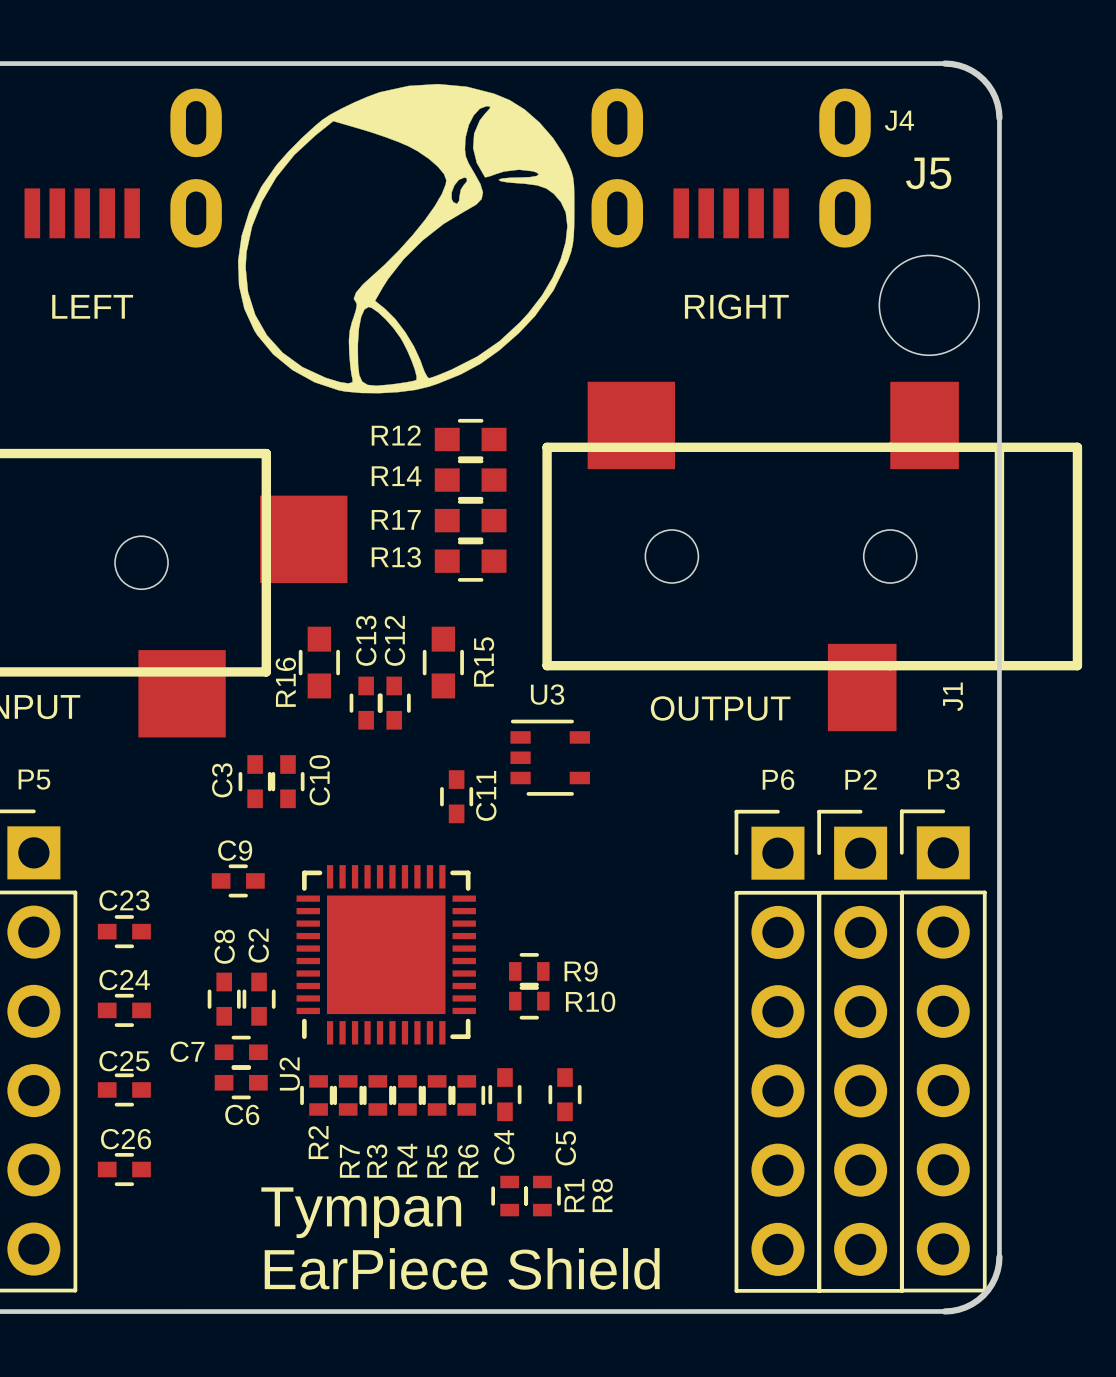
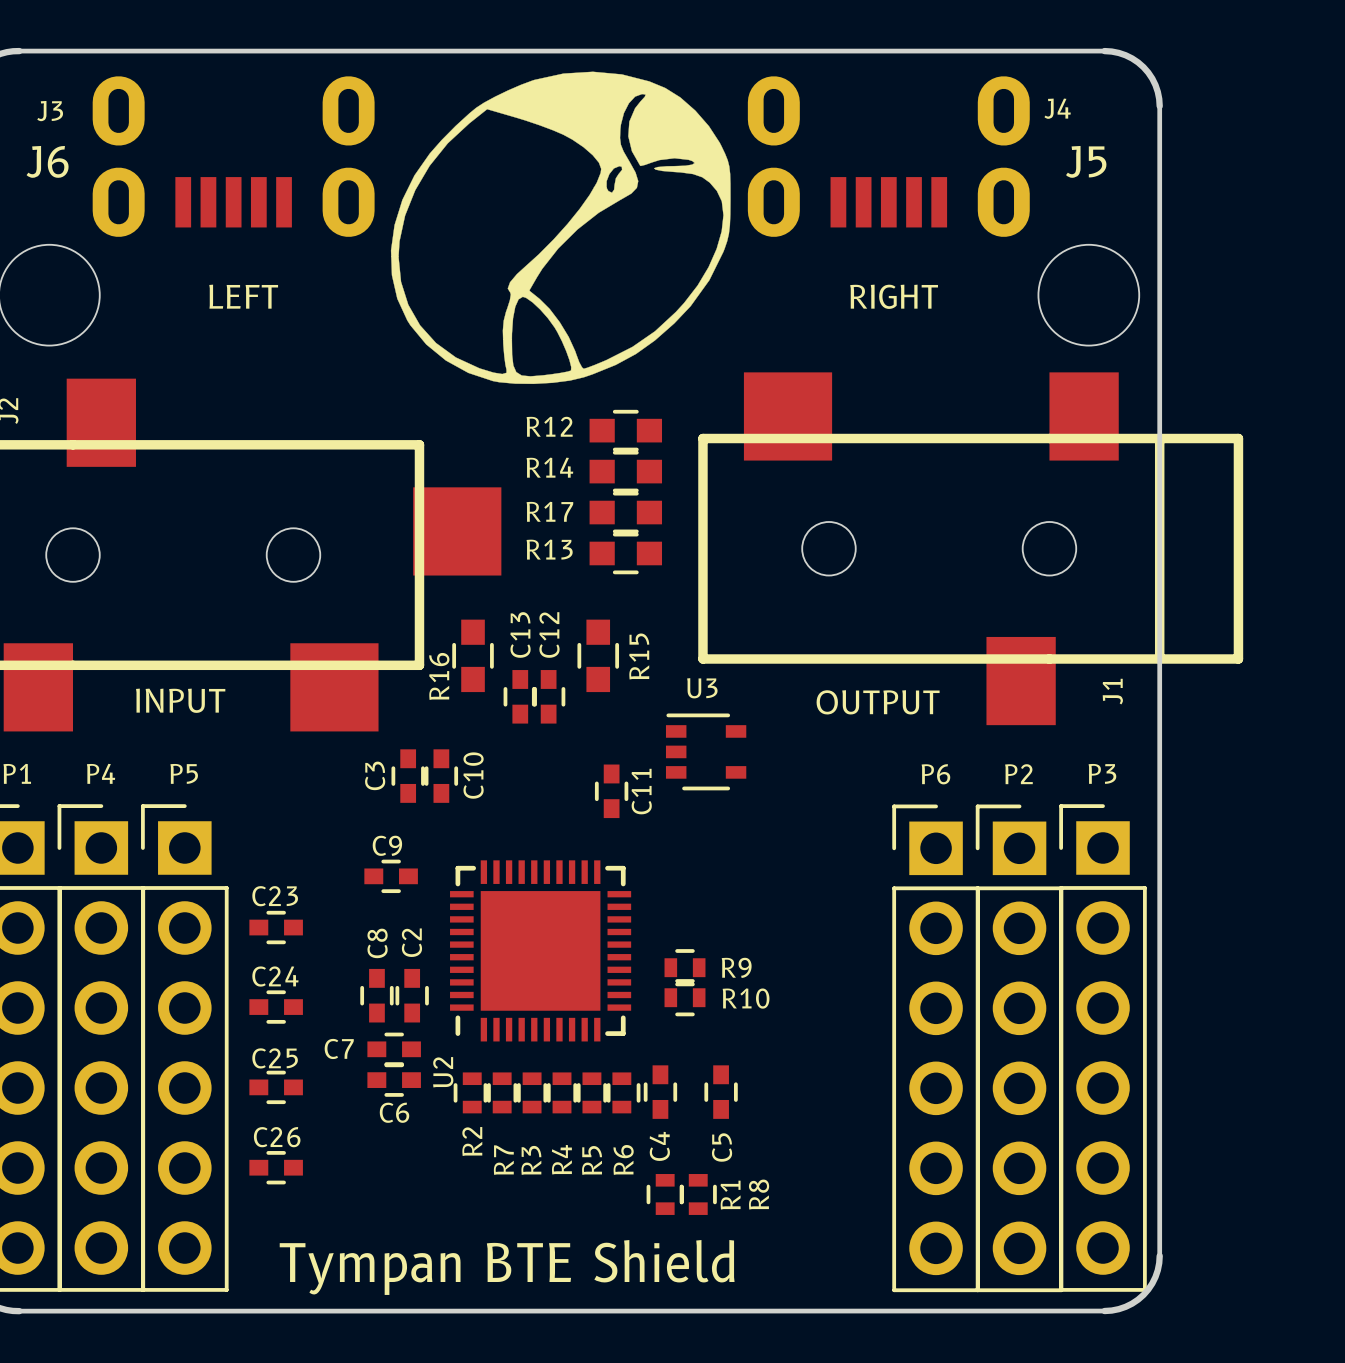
text: Tympan (361, 1212) -> none
text: none -> Tympan BTE Shield (507, 1267)
text: EarPiece Shield (462, 1268) -> none

